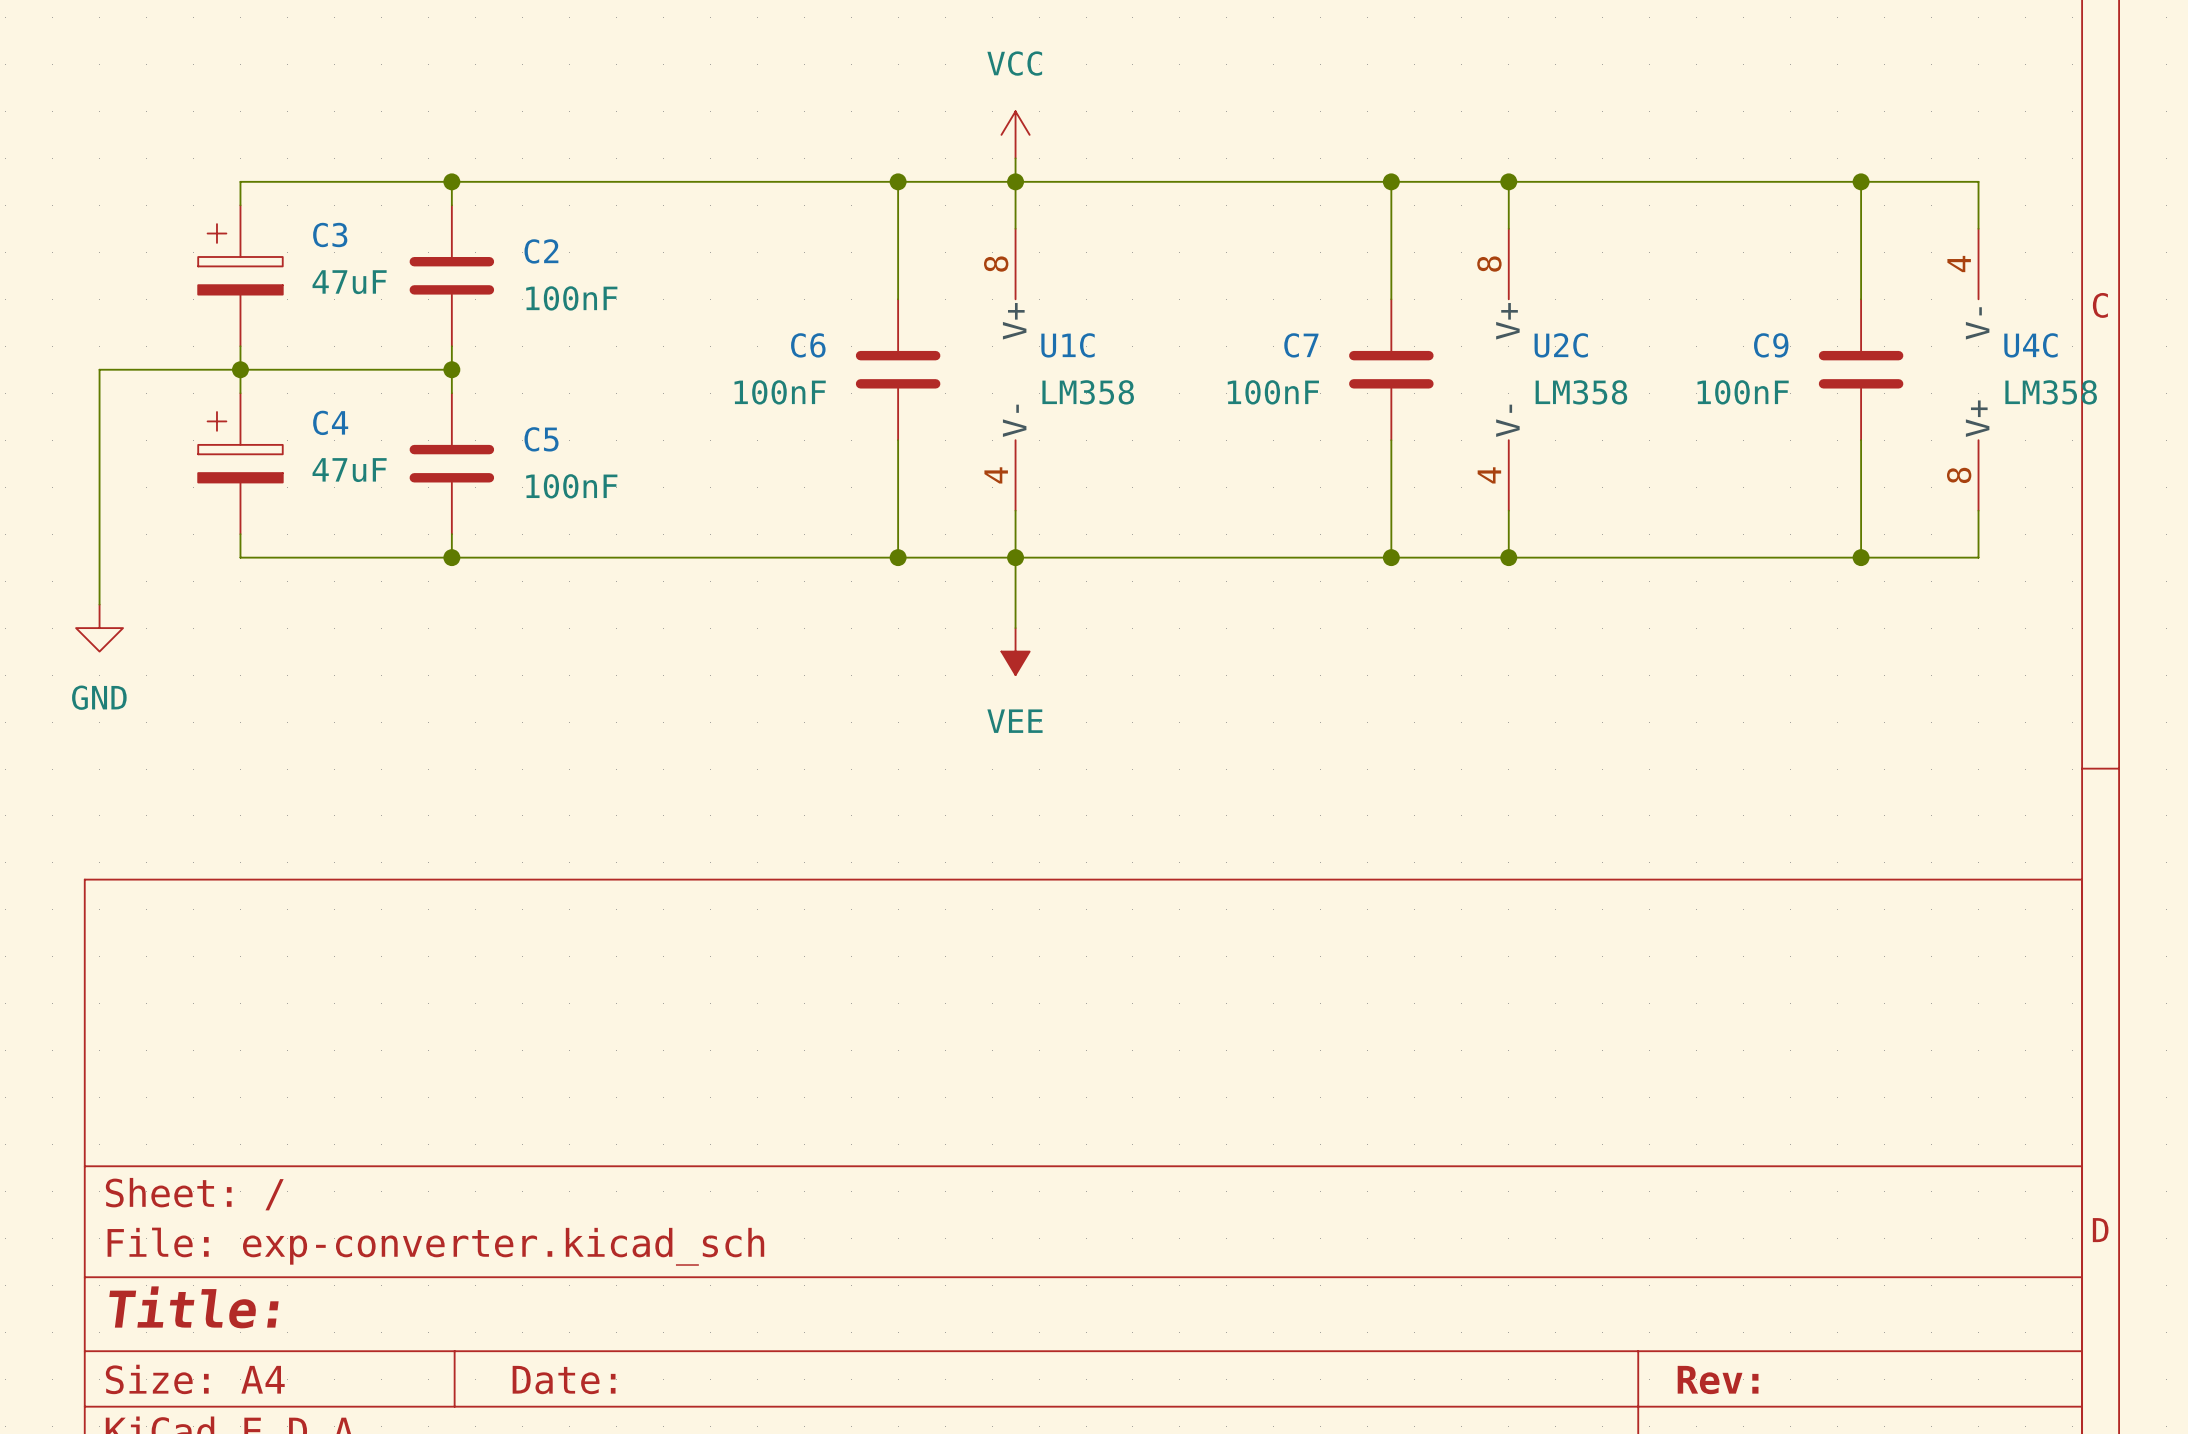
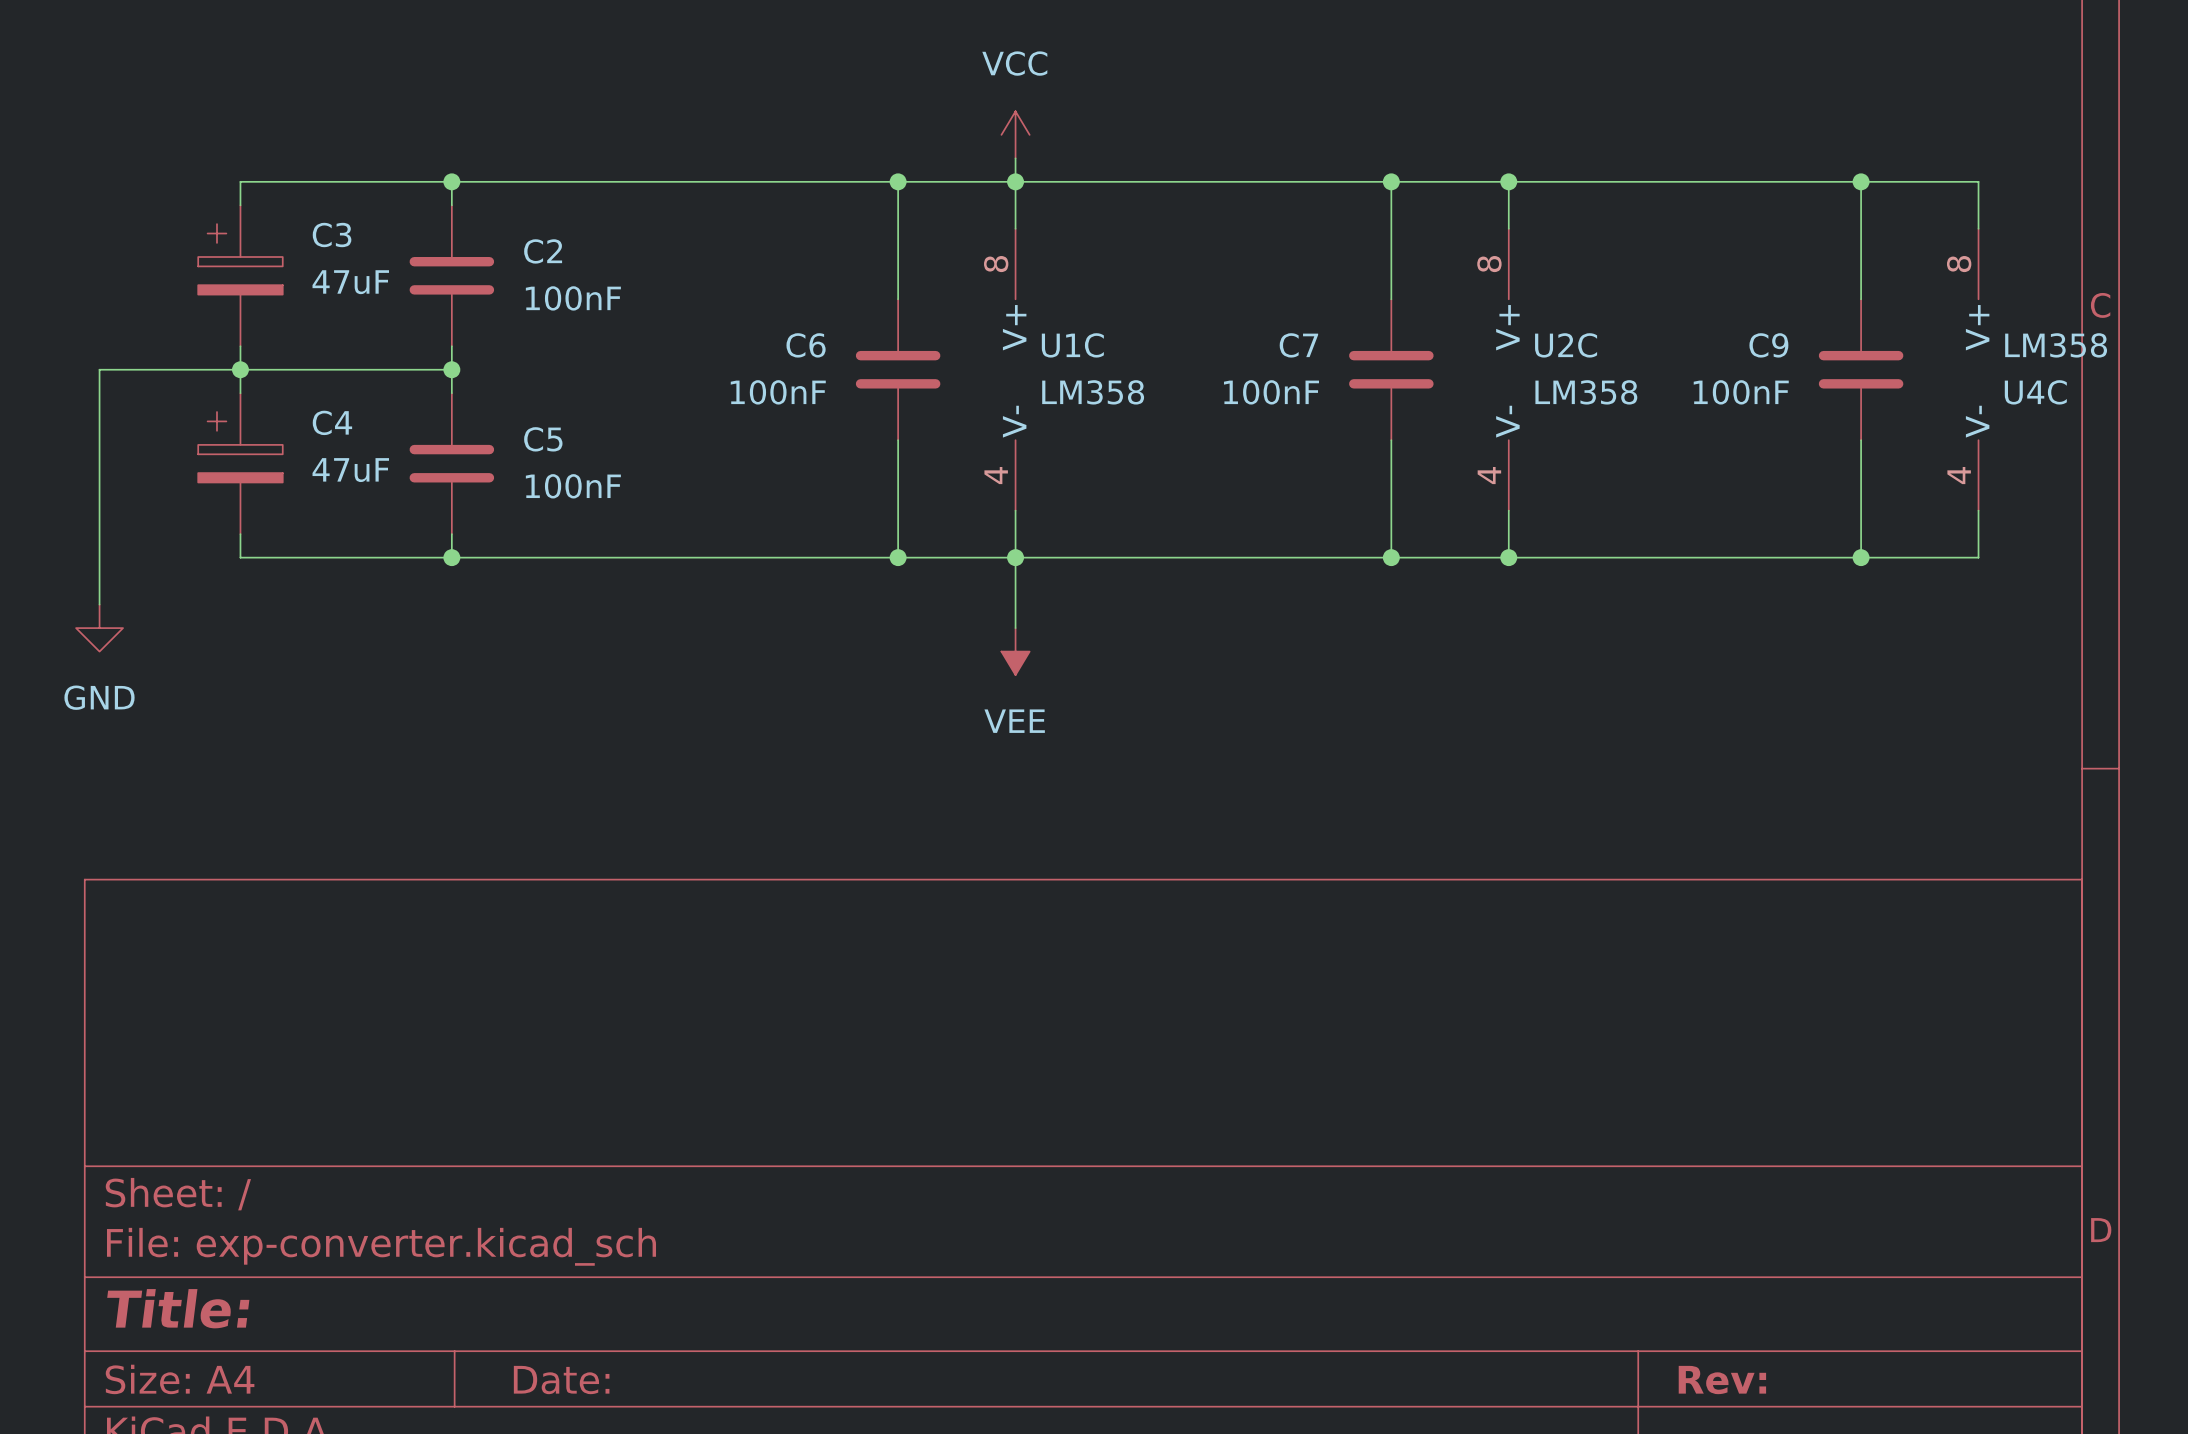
U4C name position: U4C (2030, 345) -> U4C (2035, 392)
U4C rotation: 0° (1978, 369) -> 180° (1978, 369)
U4C value position: LM358 (2051, 392) -> LM358 (2056, 345)

